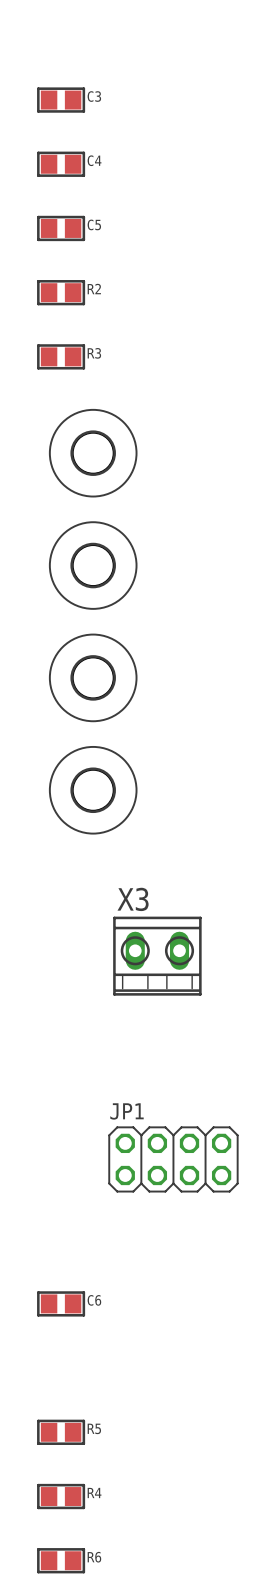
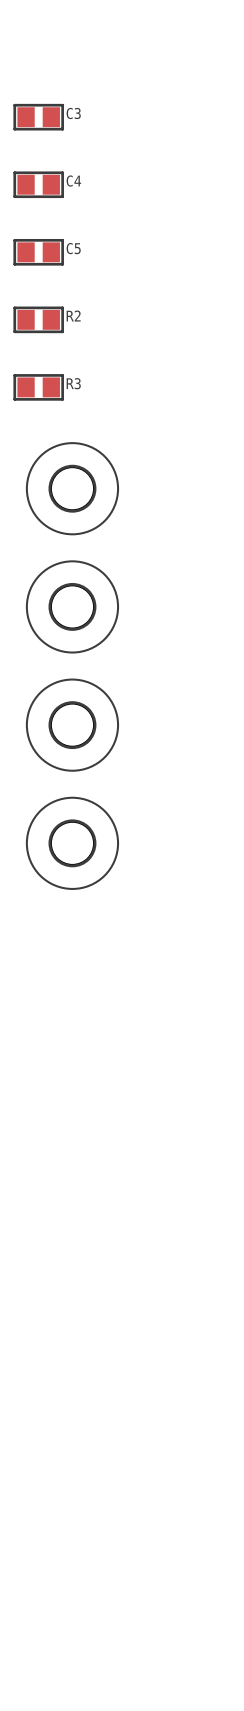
X3: (157, 956) -> none
JP1: (173, 1159) -> none
C6: (61, 1303) -> none
R5: (61, 1432) -> none
R4: (61, 1496) -> none
R6: (61, 1560) -> none

